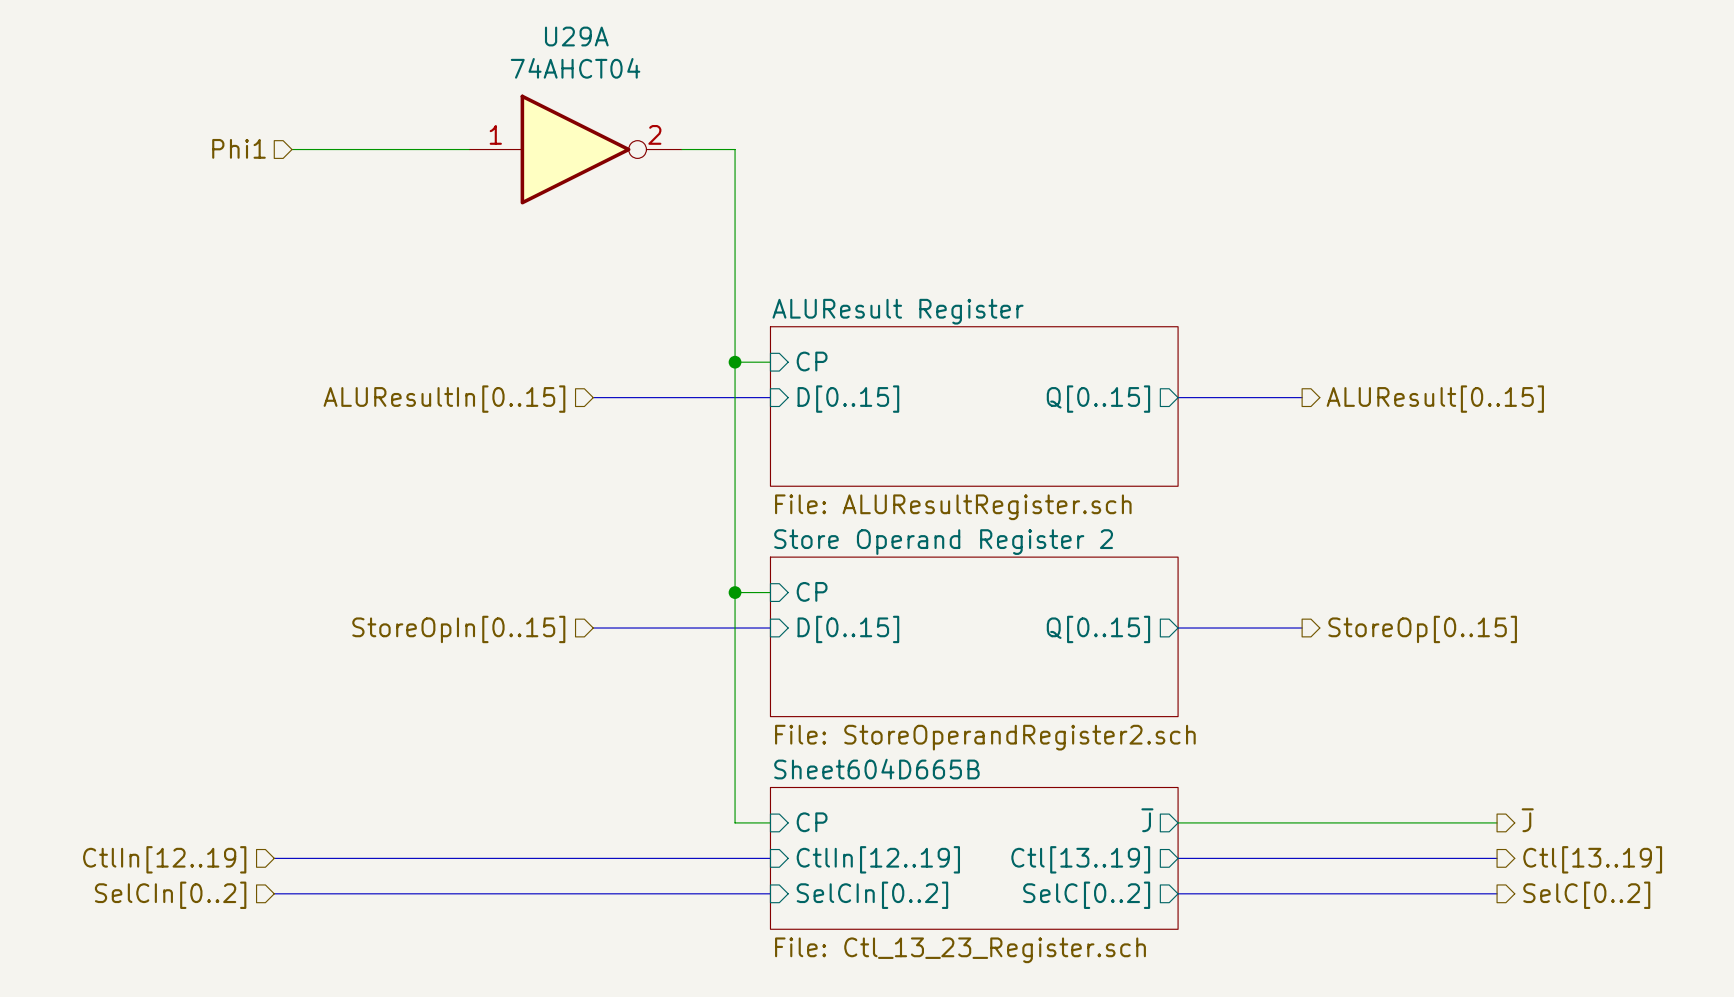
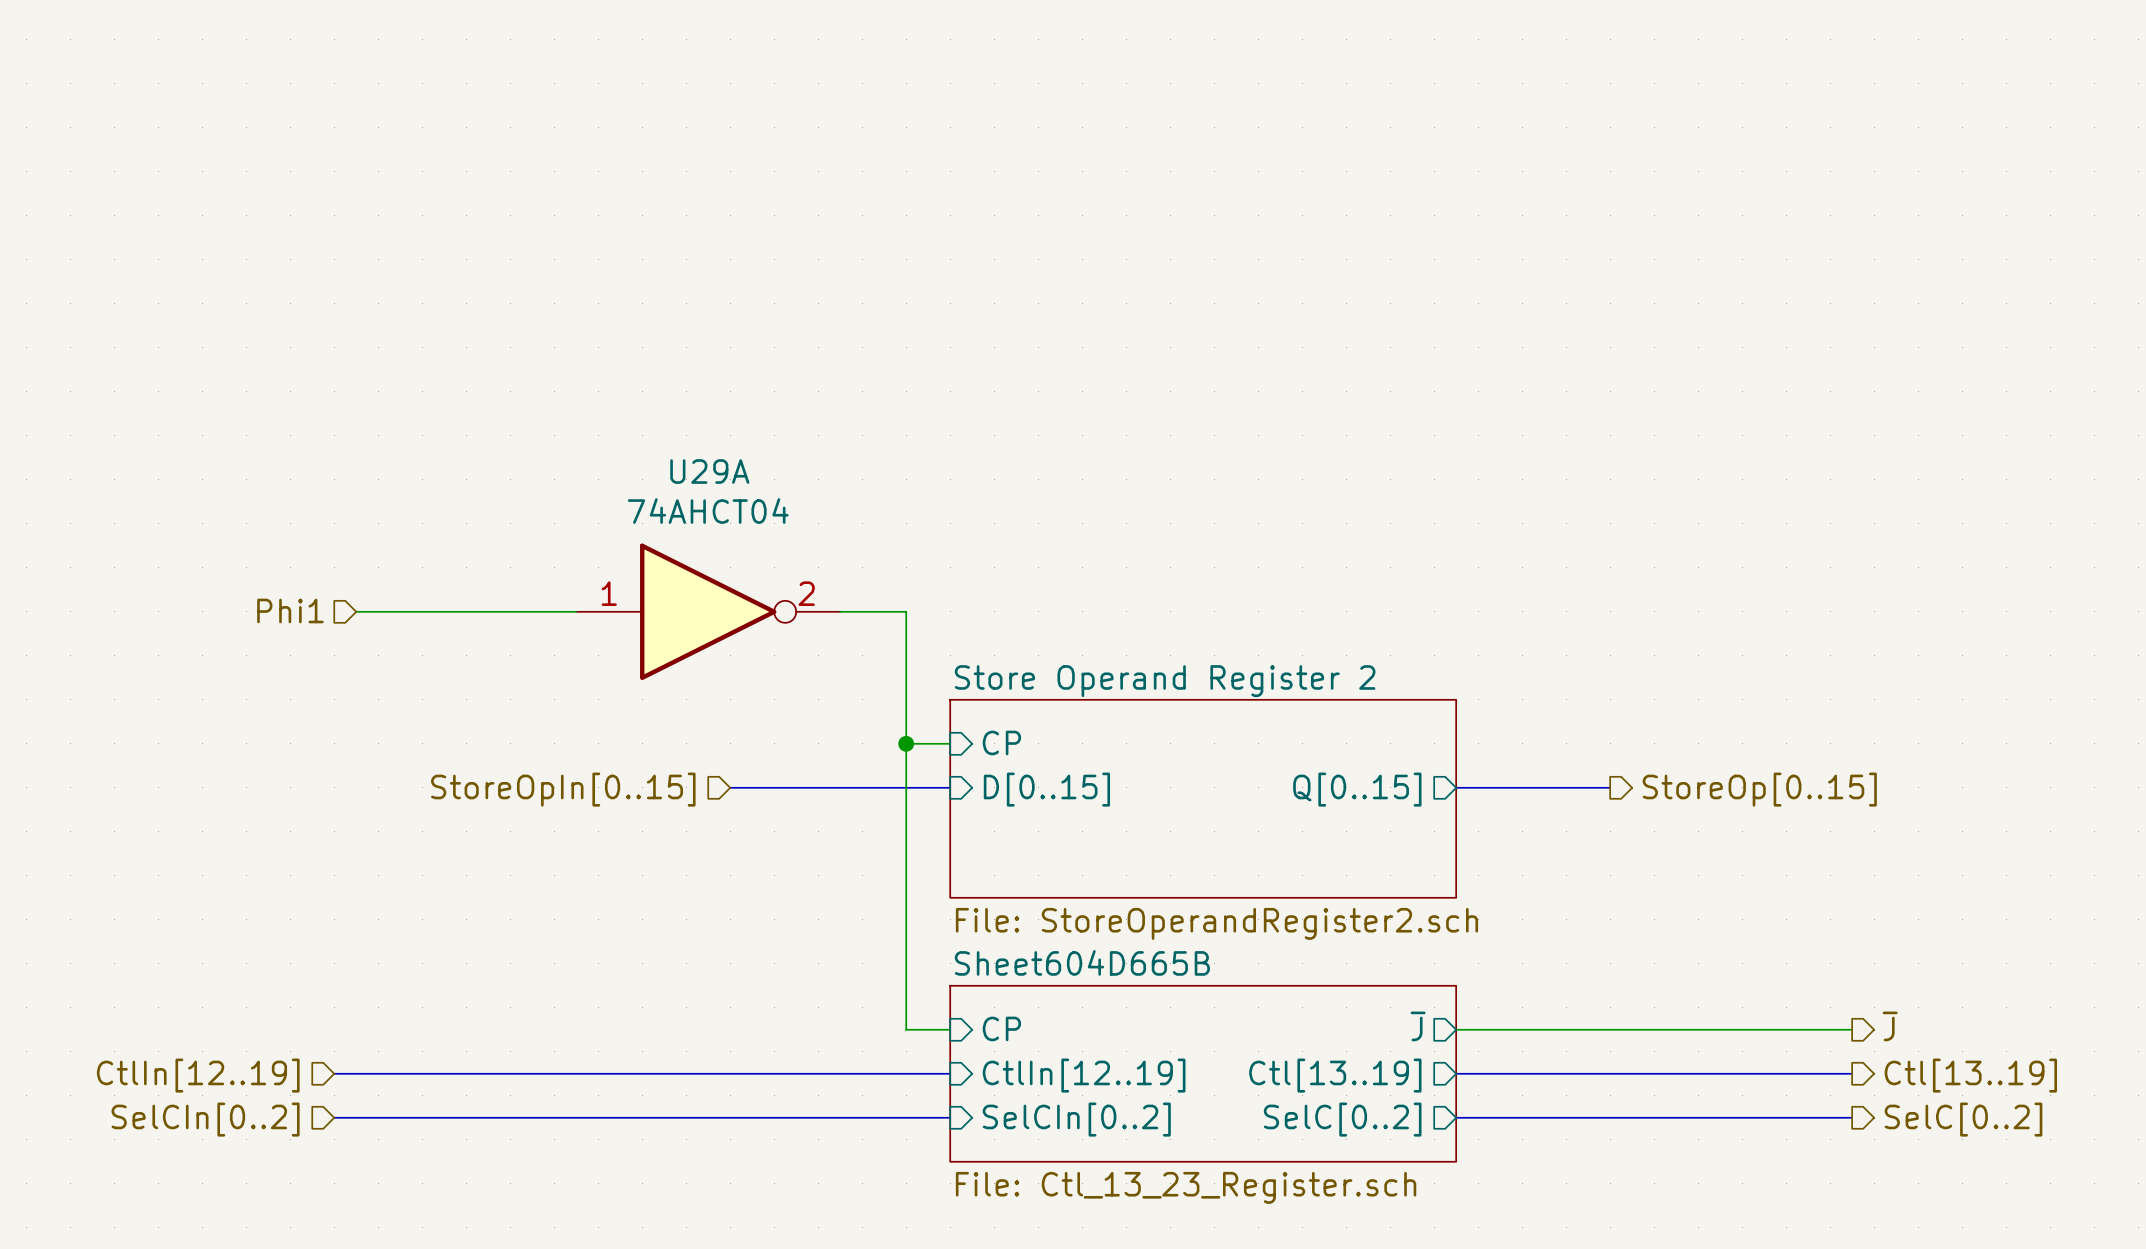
hierarchical label position: Phi1 (238, 148) -> Phi1 (290, 610)
wire: (292, 149) (469, 149) -> (356, 611) (576, 611)
U29A position: (575, 149) -> (708, 611)
wire: (681, 149) (735, 149) (735, 486) -> (840, 611) (906, 611)
sheet pin: CP (812, 361) -> none
wire: (735, 362) (770, 362) -> none
junction: (735, 362) -> none
bus: (593, 397) (770, 397) -> none
bus: (1178, 397) (1302, 397) -> none
hierarchical label: ALUResultIn[0..15] (444, 399) -> none
sheet pin: D[0..15] (848, 399) -> none
sheet pin: Q[0..15] (1098, 399) -> none
hierarchical label: ALUResult[0..15] (1435, 399) -> none
sheet ALUResult Register: File: ALUResultRegister.sch (974, 406) -> none

